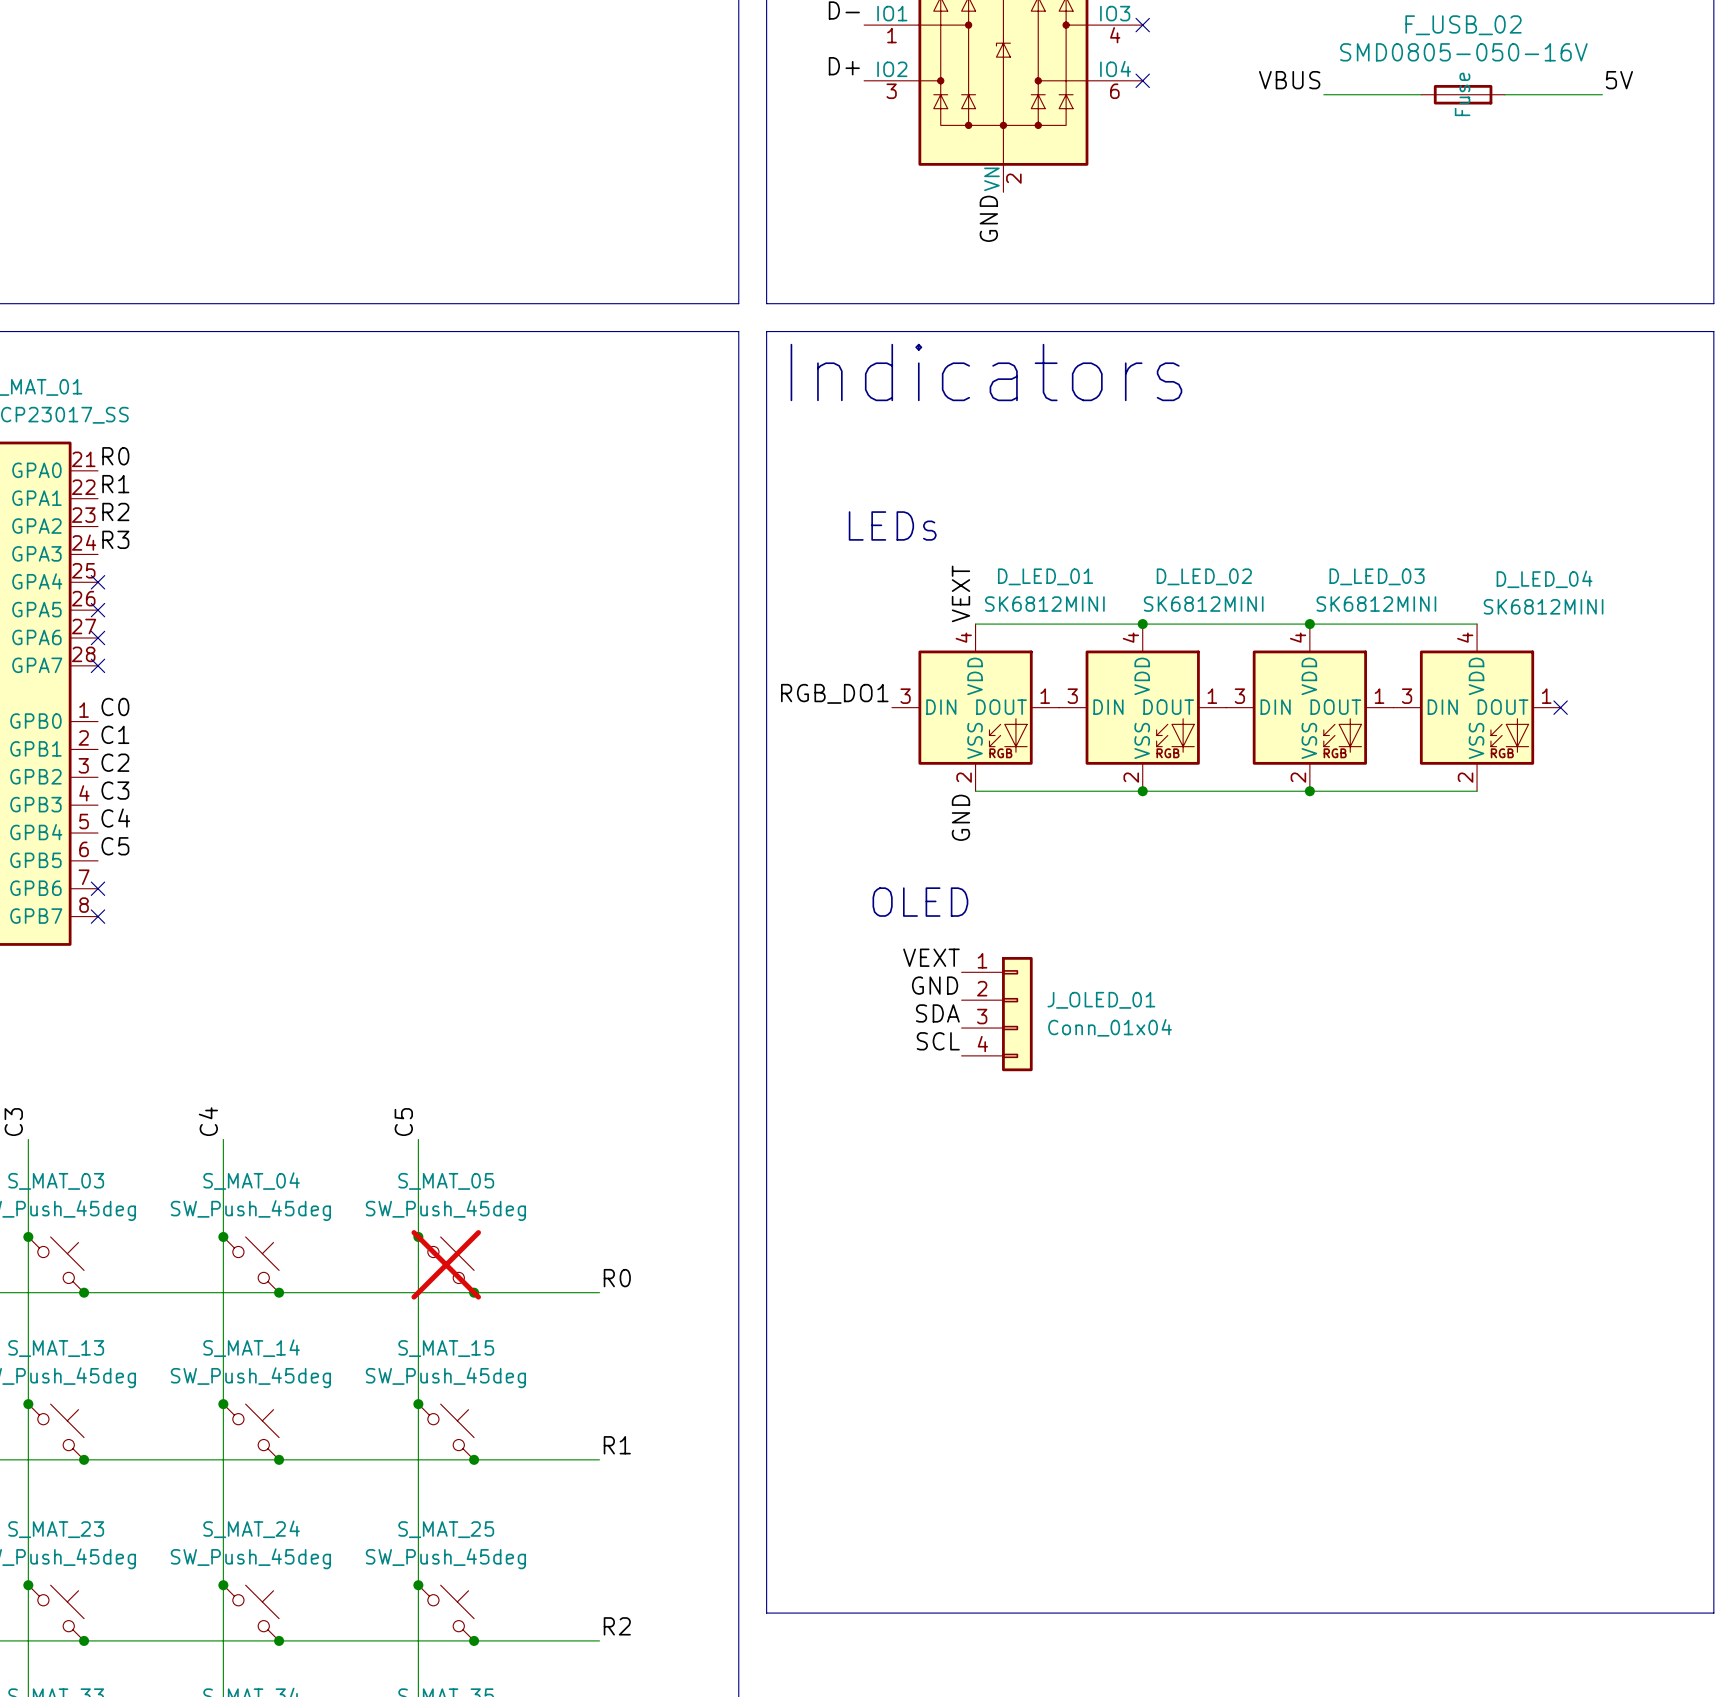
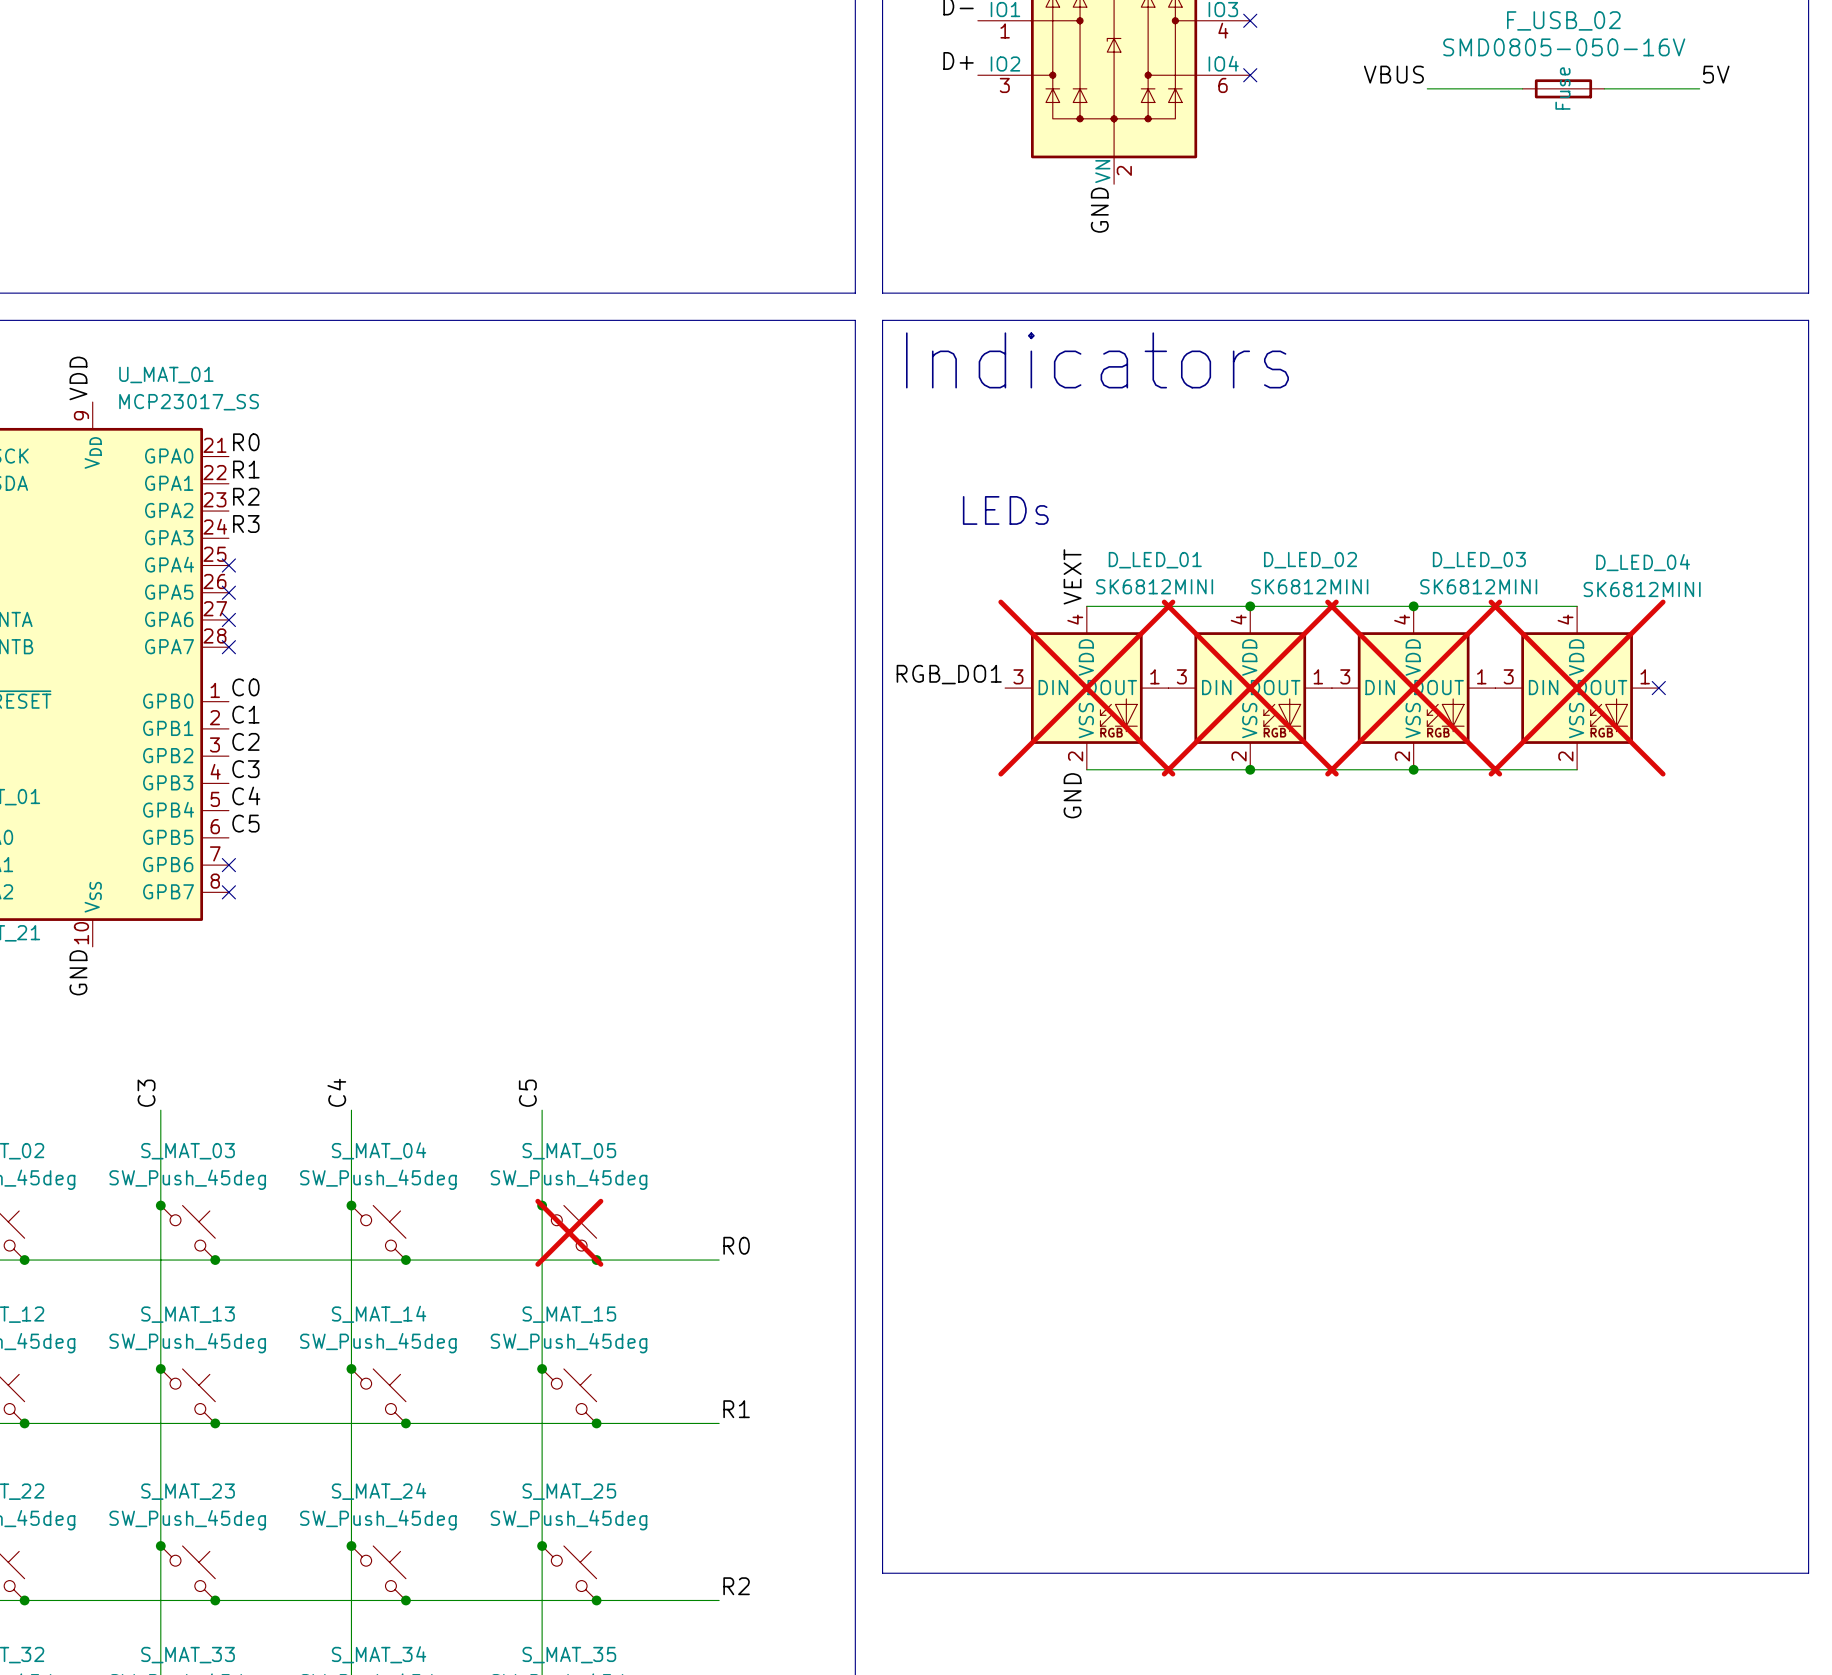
D_LED_01 do-not-place cross: none -> (1086, 688)
D_LED_02 do-not-place cross: none -> (1250, 688)
D_LED_03 do-not-place cross: none -> (1413, 688)
D_LED_04 do-not-place cross: none -> (1577, 688)
text: OLED (920, 902) -> none
label: VEXT (931, 957) -> none
label: GND (935, 985) -> none
label: SDA (937, 1013) -> none
J_OLED_01: Conn_01x04 (997, 1014) -> none
label: SCL (938, 1041) -> none

